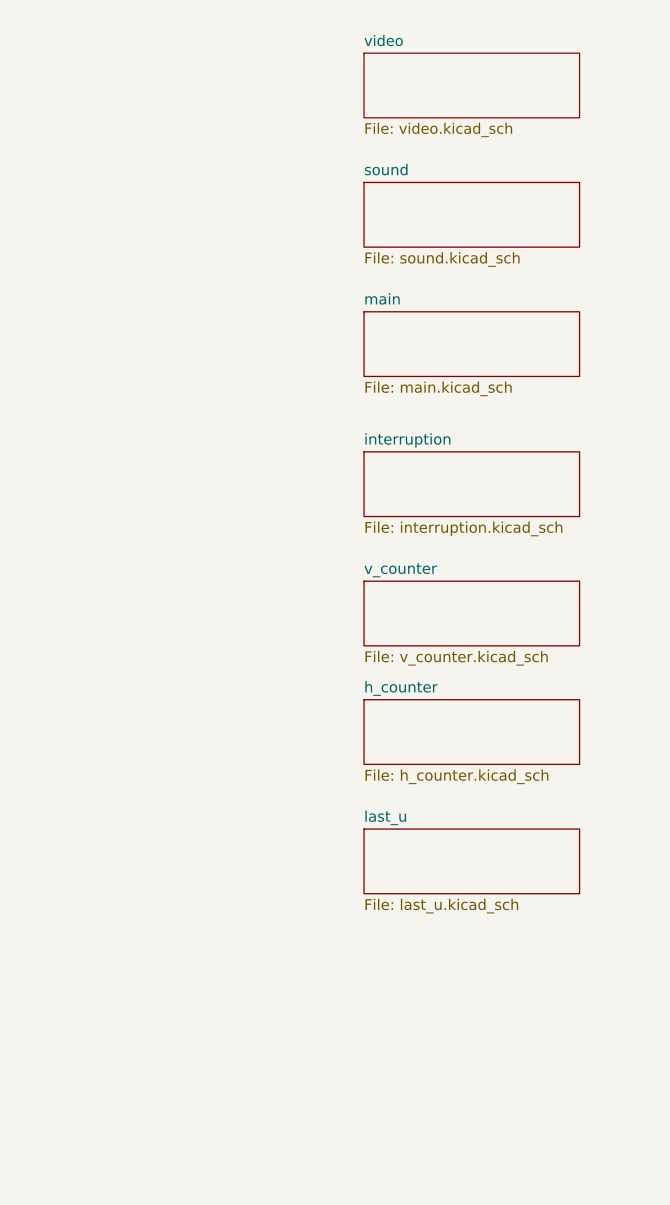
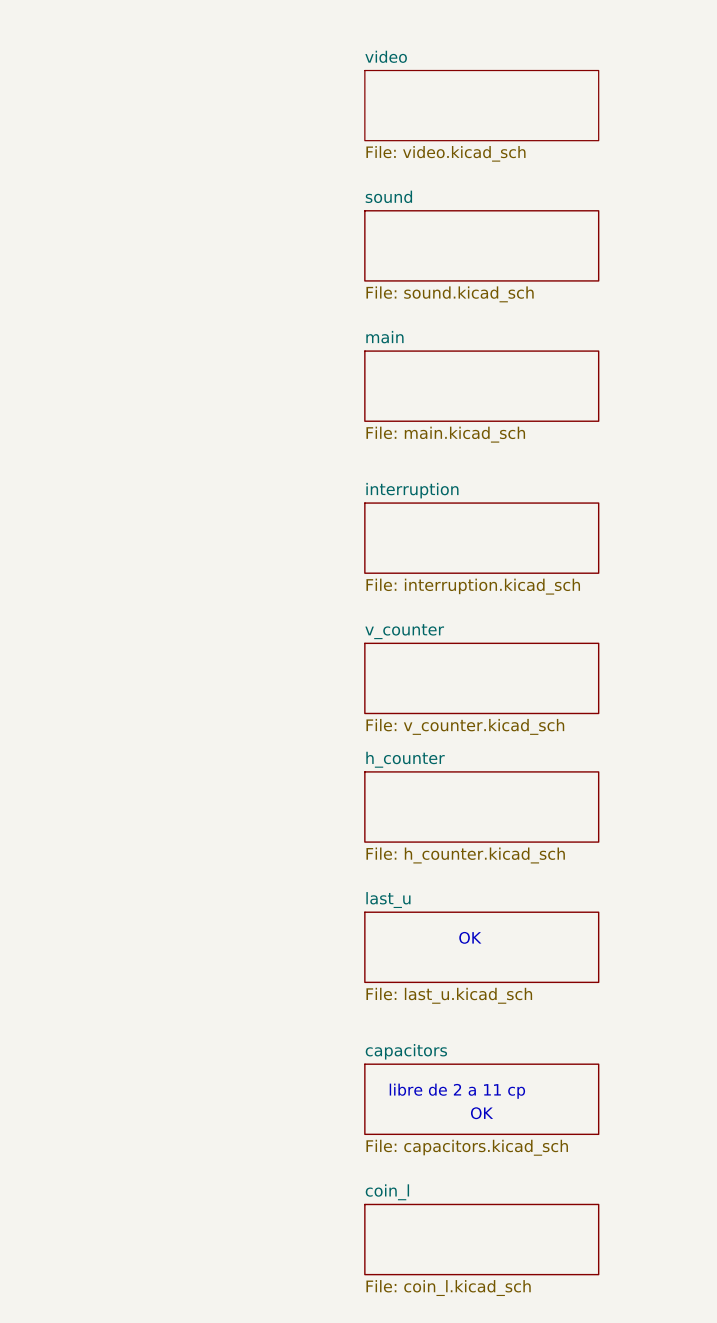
text: none -> OK (470, 937)
text: none -> libre de 2 a 11 cp (457, 1091)
sheet capacitors: none -> File: capacitors.kicad_sch (481, 1099)
text: none -> OK (482, 1113)
sheet coin_l: none -> File: coin_l.kicad_sch (481, 1239)

